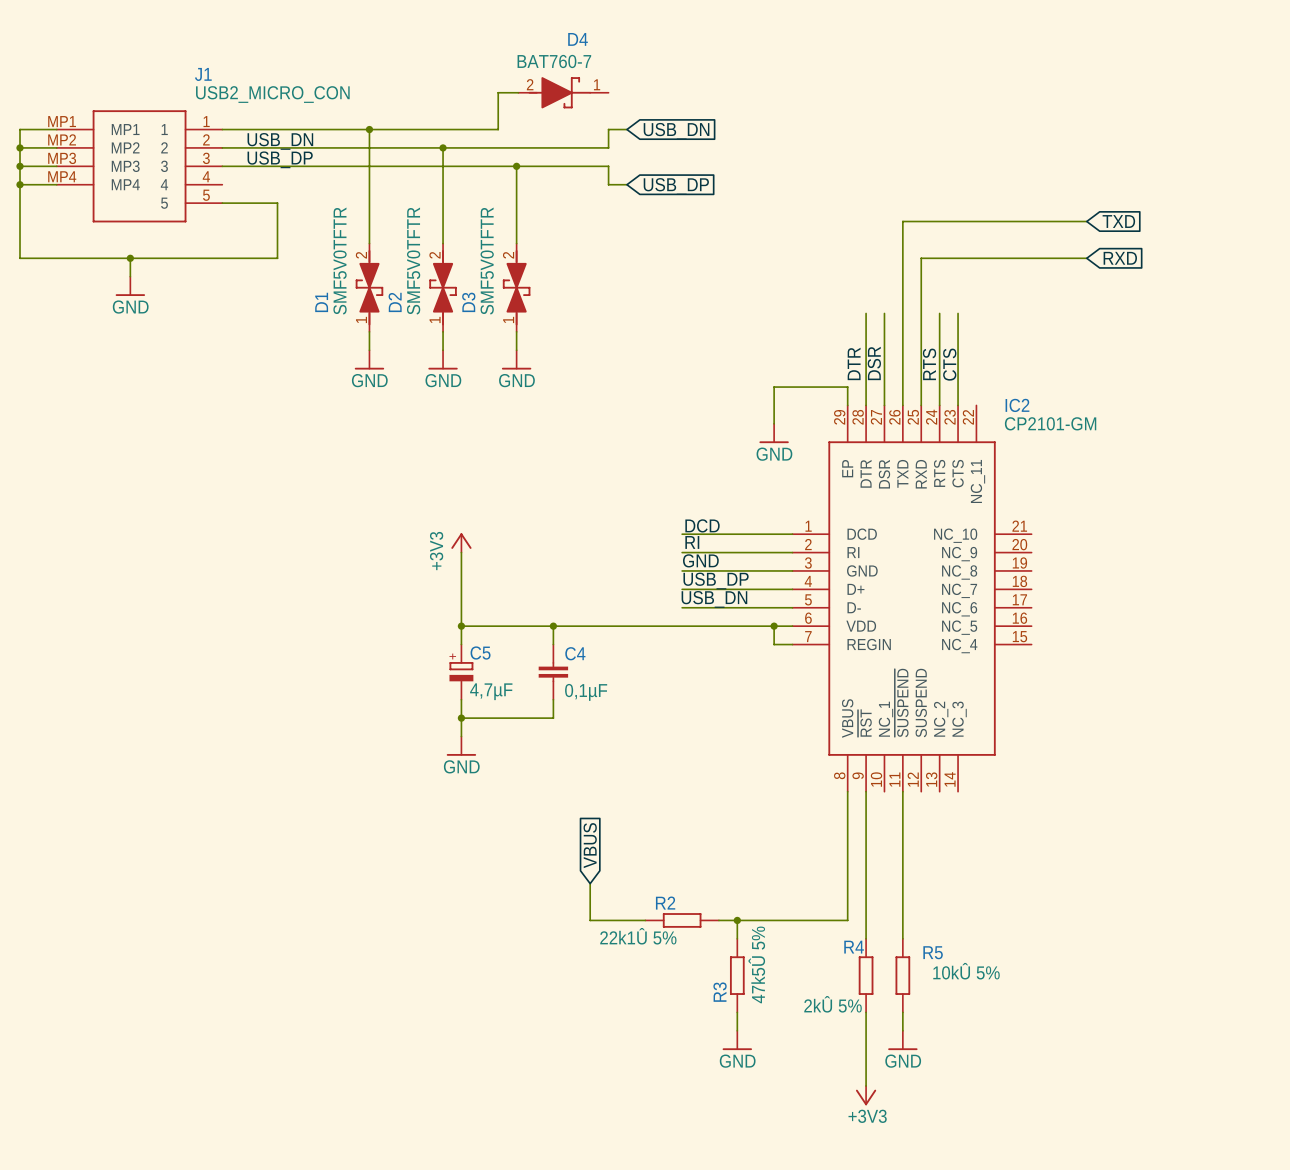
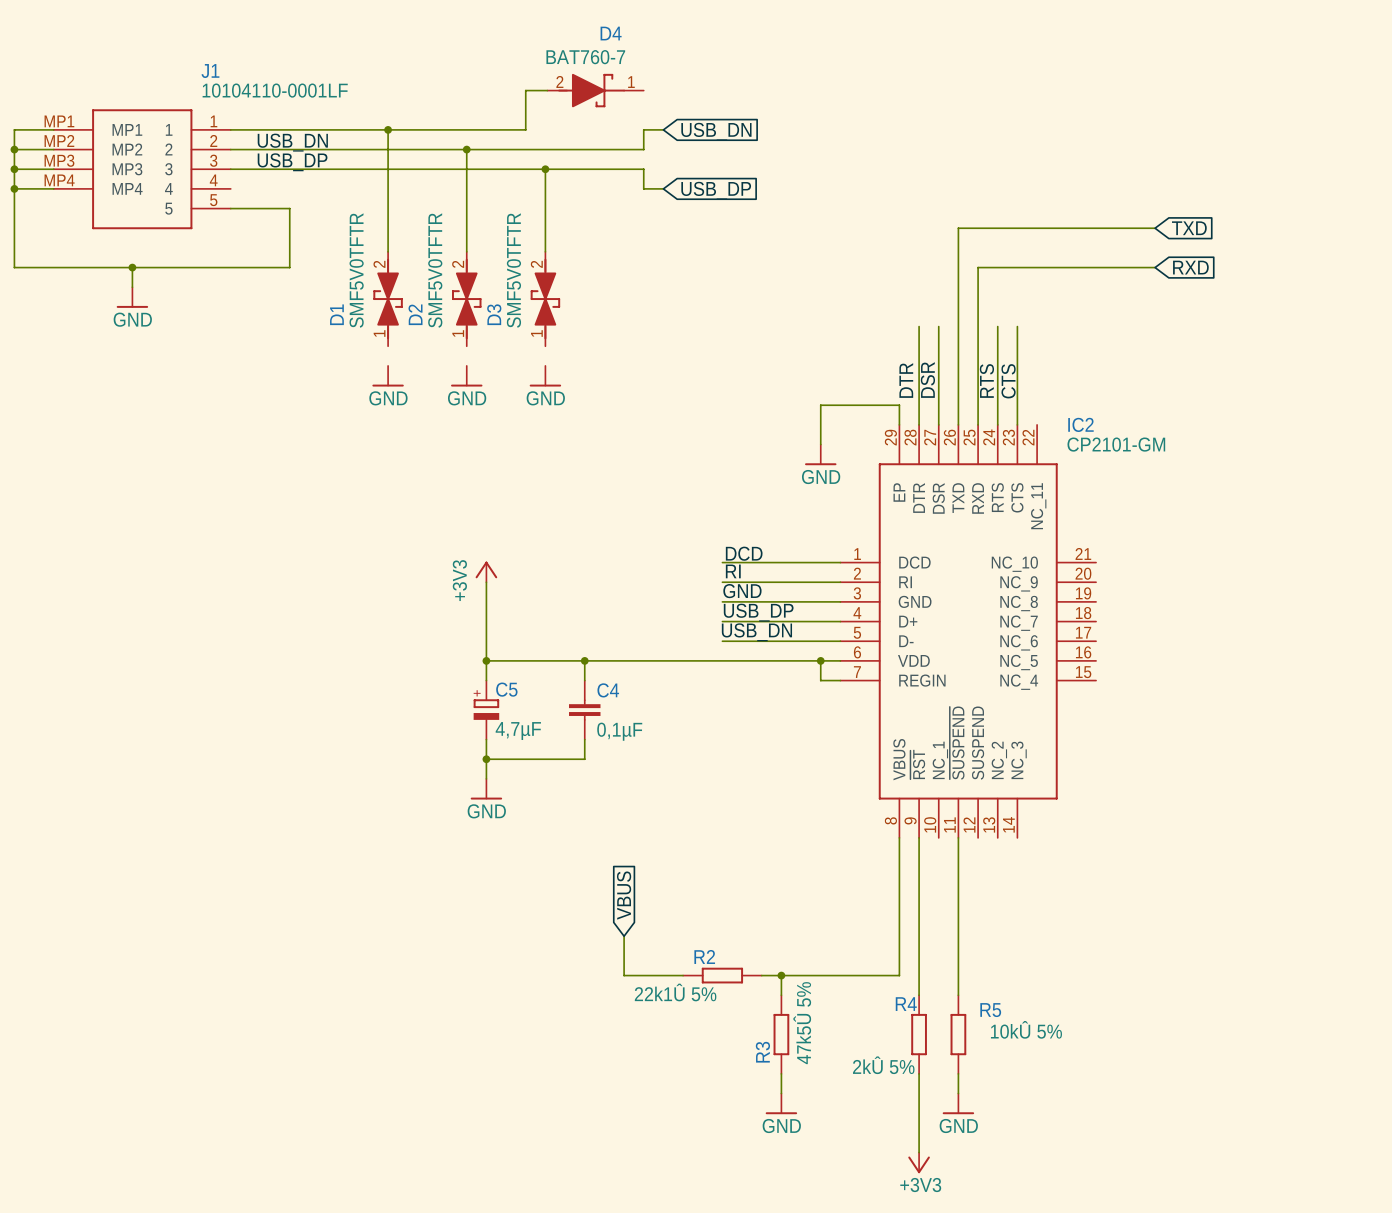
J1 value: USB2_MICRO_CON (272, 94) -> 10104110-0001LF (275, 90)
wire: (369, 331) (369, 350) -> none
wire: (443, 331) (443, 350) -> none
wire: (516, 331) (516, 350) -> none

